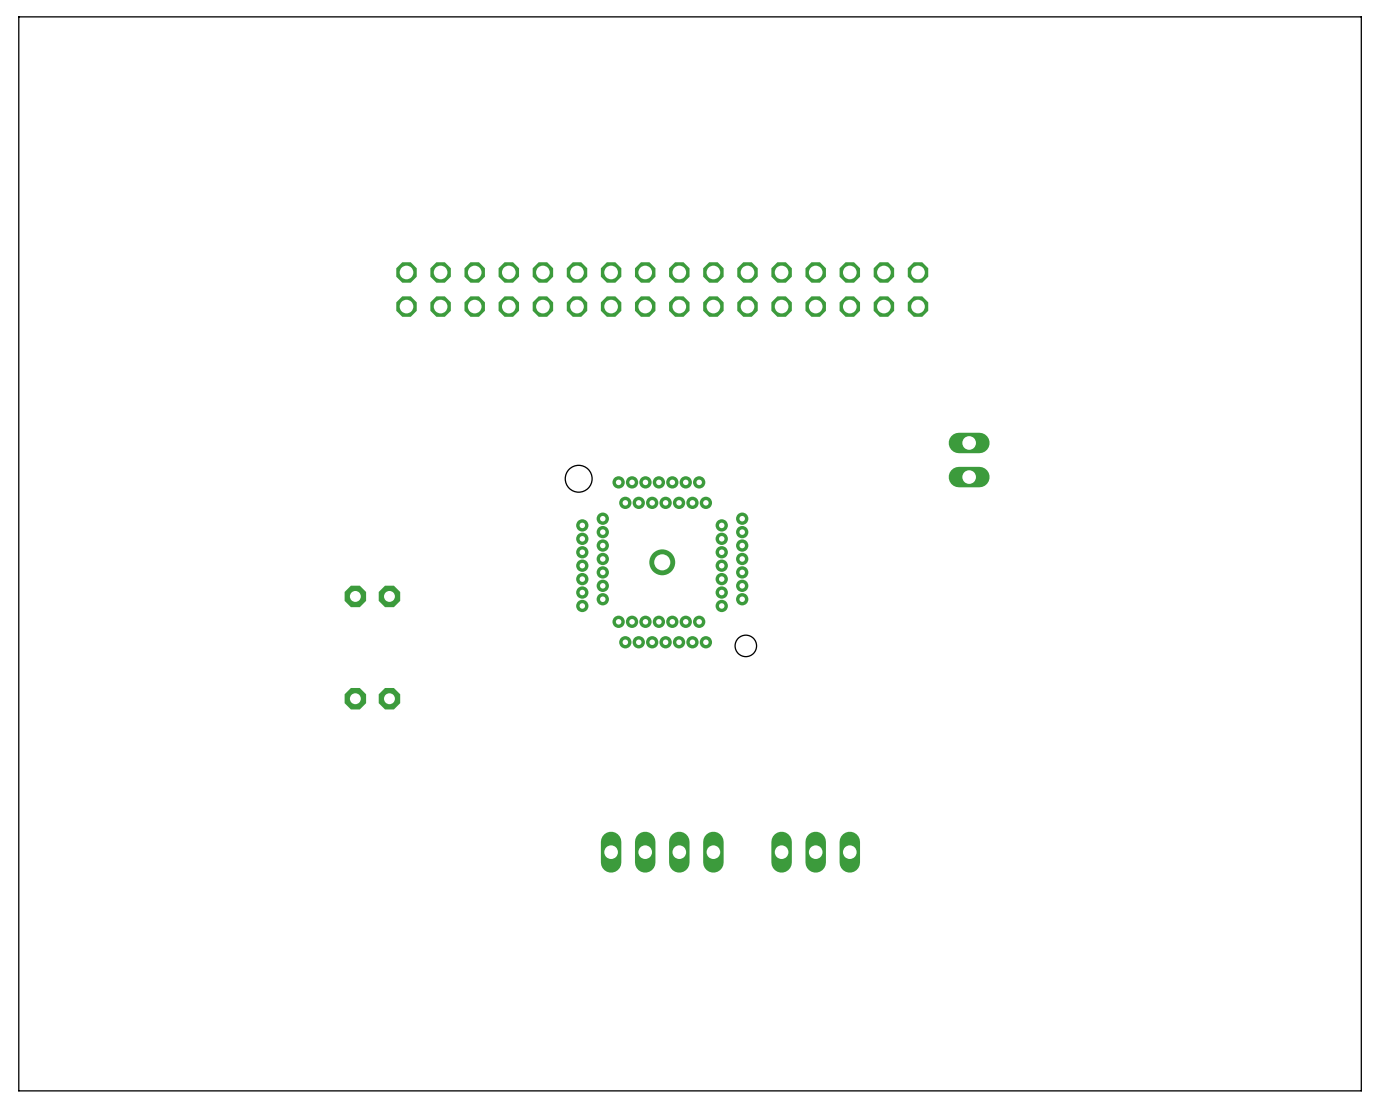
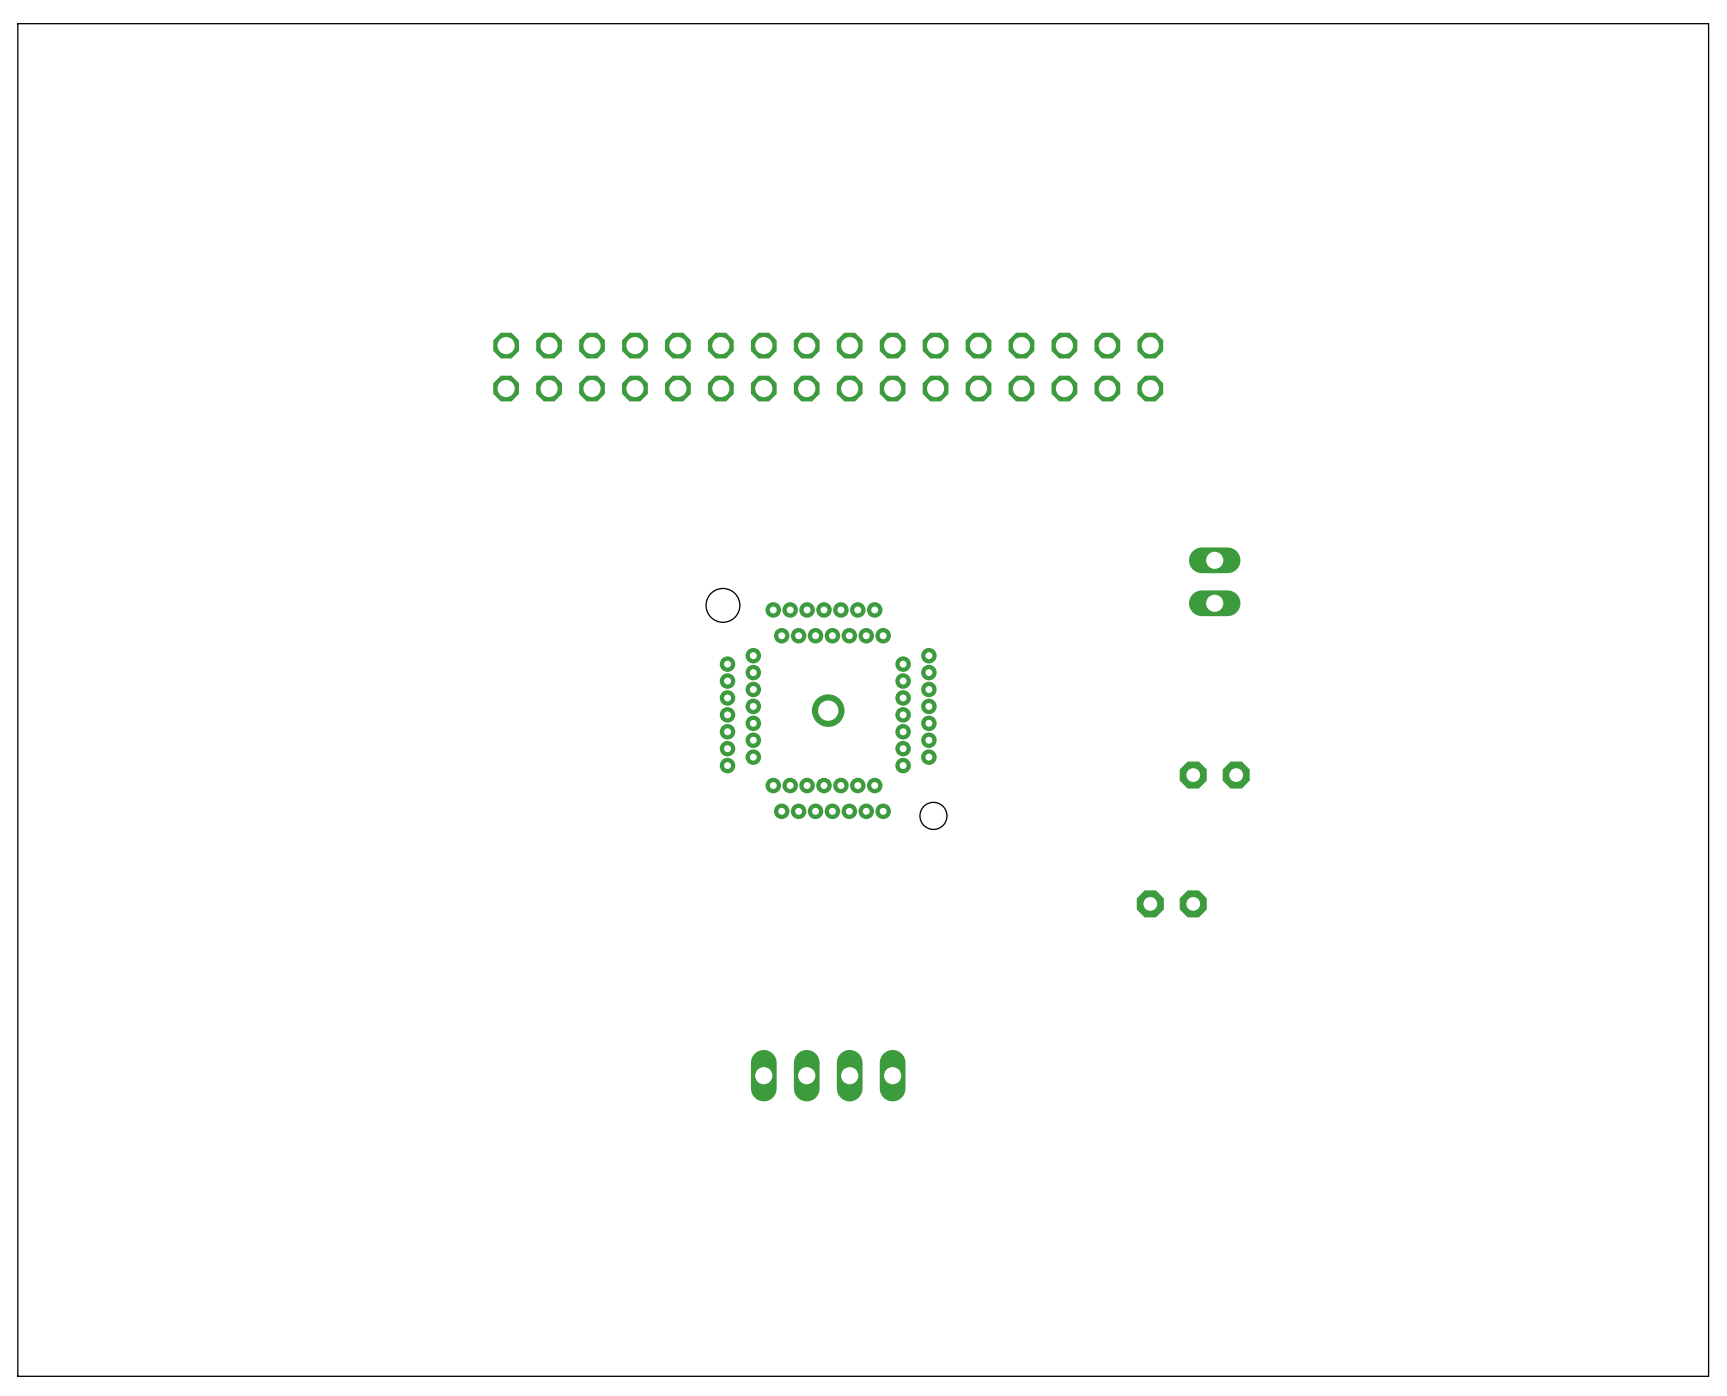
part: (372, 596) -> none
part: none -> (1214, 775)
part: (372, 698) -> none
part: none -> (1171, 903)
part: (815, 852) -> none

